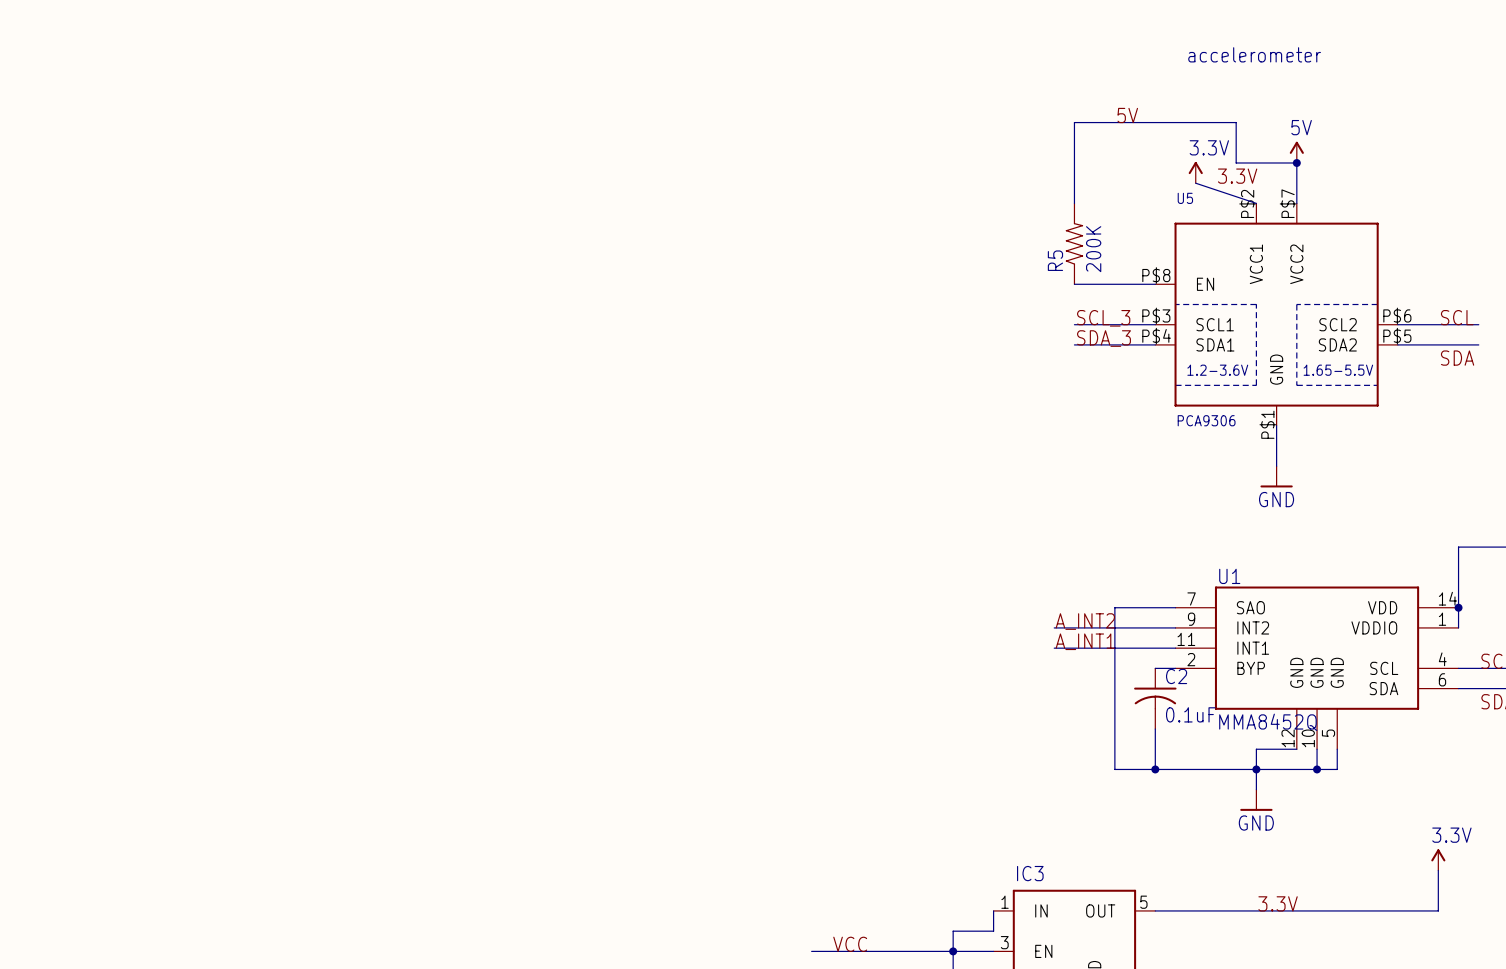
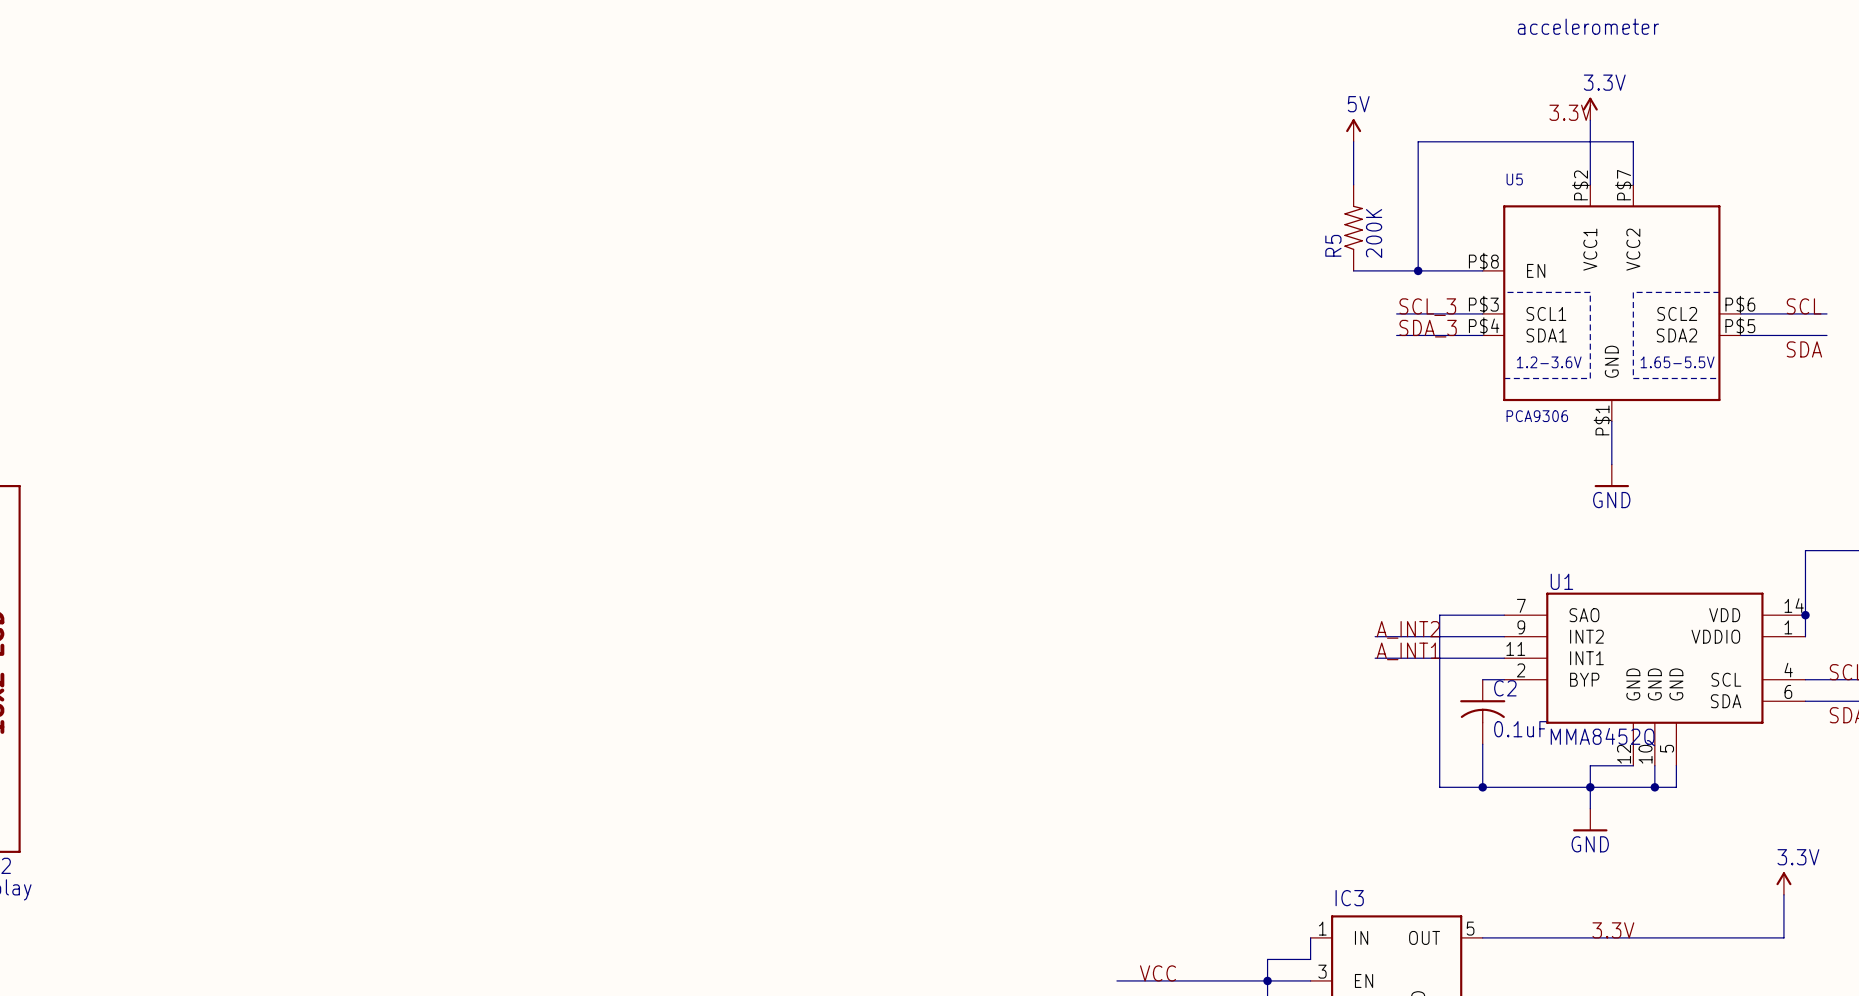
label: 5V (1127, 115) -> none
power symbol: none -> 5V (1353, 130)
power symbol: 5V (1296, 152) -> none
wire: none -> (1353, 141) (1353, 184)
wire: (1236, 162) (1236, 122) (1074, 122) (1074, 203) -> (1568, 141) (1418, 141) (1418, 270)
junction: (1296, 162) -> none
power symbol position: 3.3V (1195, 172) -> 3.3V (1590, 109)
label position: 3.3V (1237, 176) -> 3.3V (1570, 112)
wire: (1195, 183) (1256, 203) -> (1590, 120) (1590, 184)
R5 position: (1074, 243) -> (1353, 227)
wire: none -> (1353, 270) (1396, 270)
junction: none -> (1418, 270)

